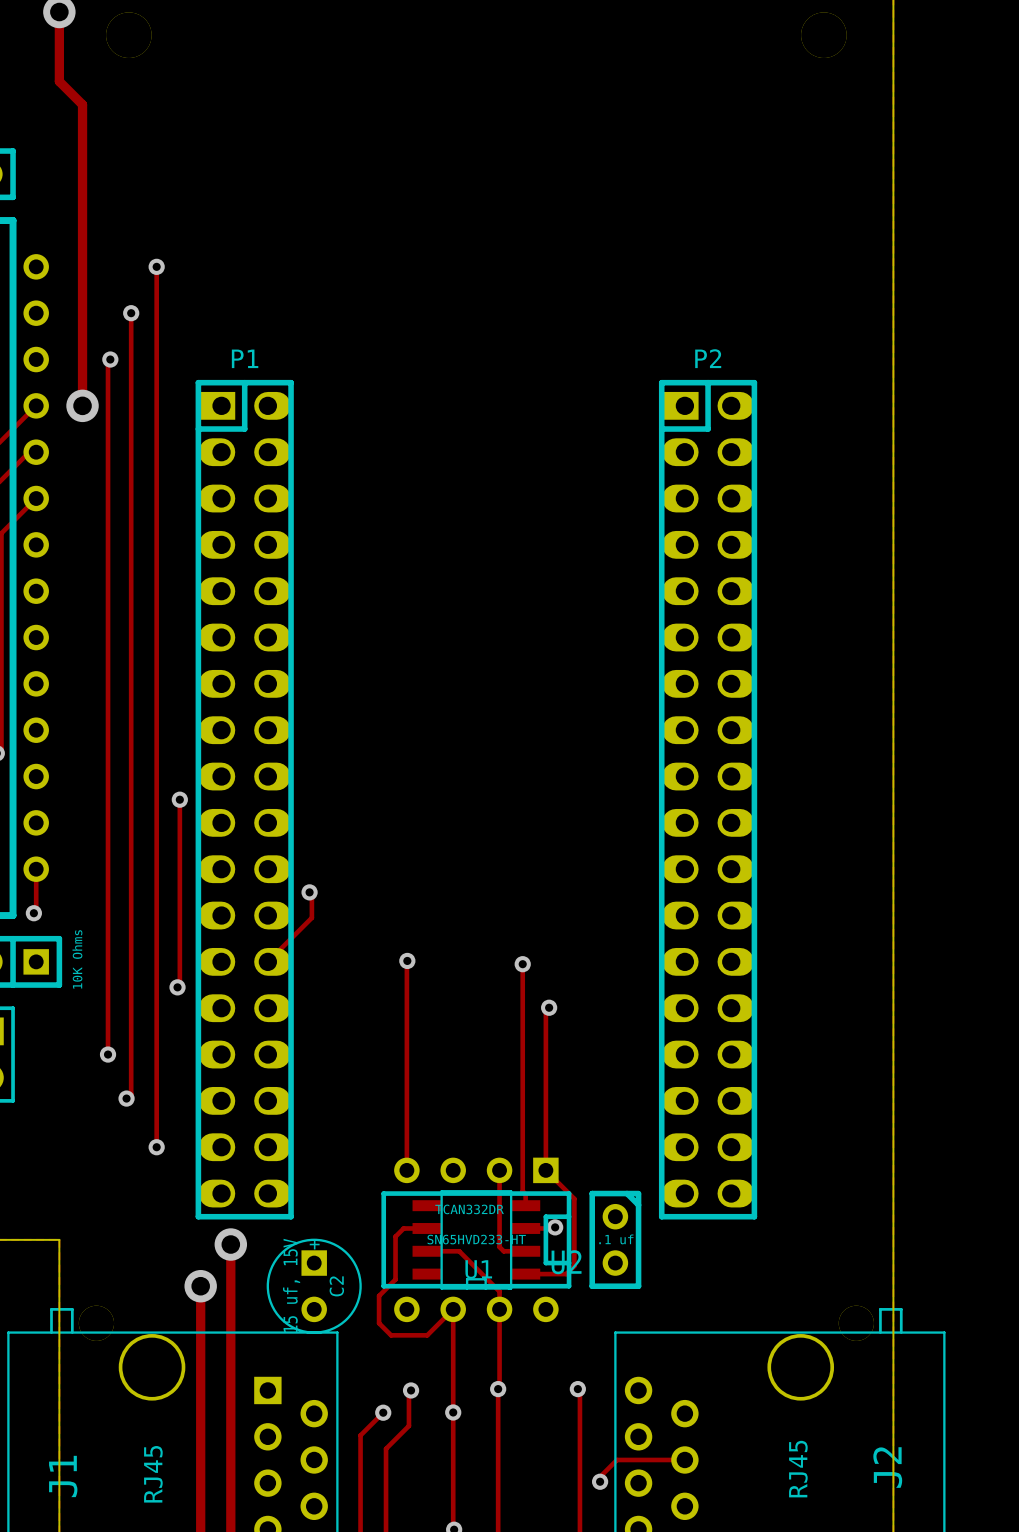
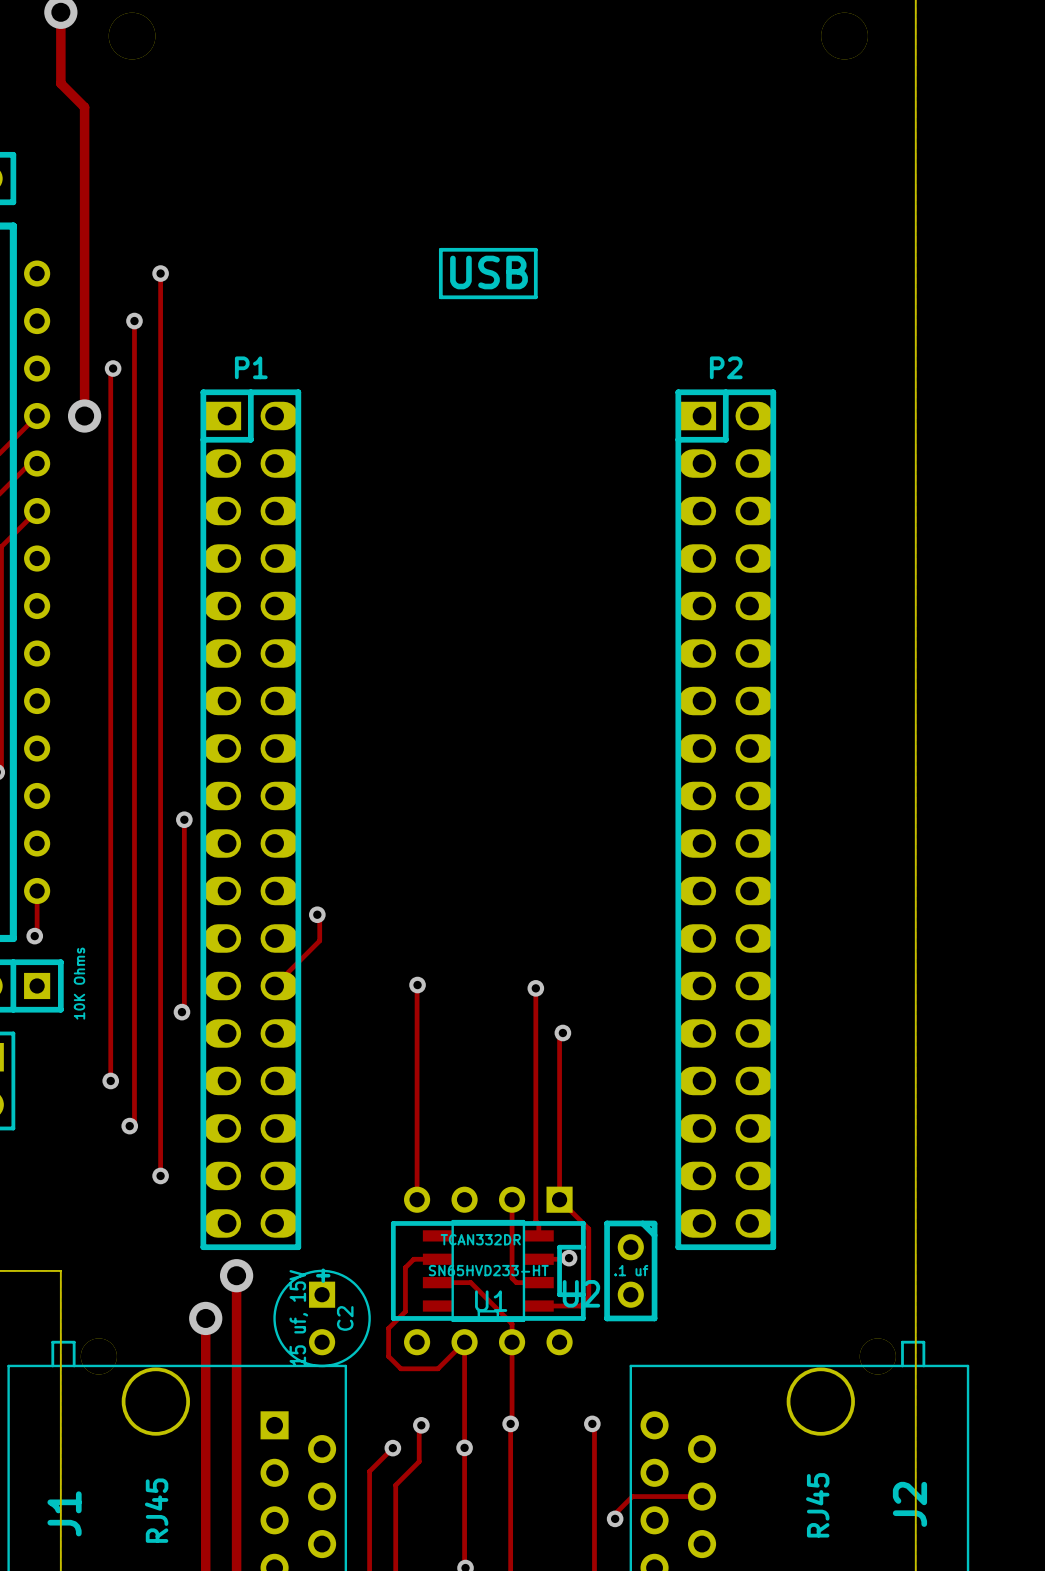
line: none -> (440, 249) (440, 297) (535, 297) (535, 249) (440, 249)
text: none -> USB (488, 272)

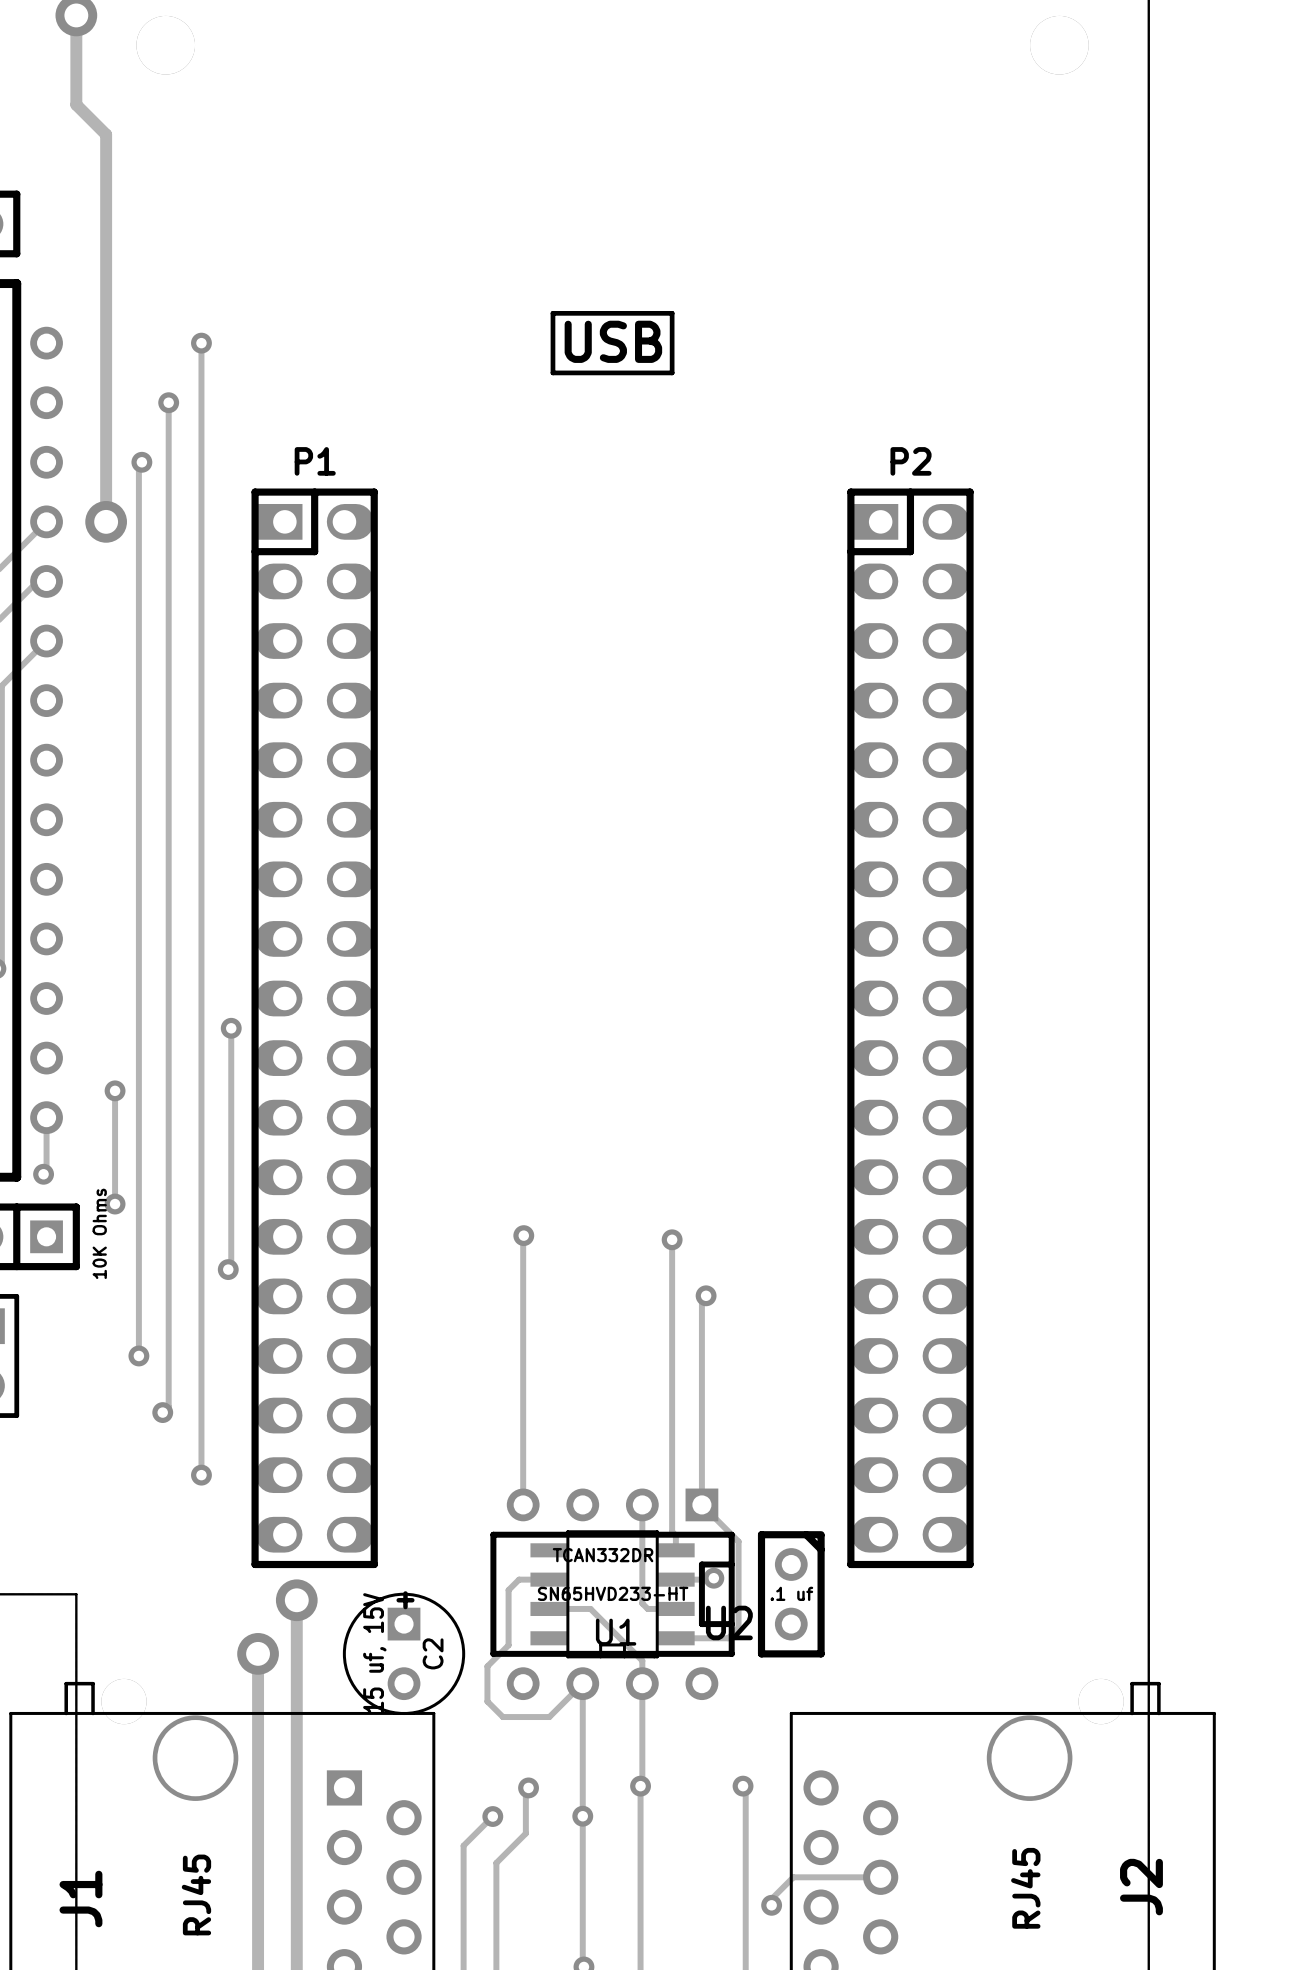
track: none -> (115, 1090) (115, 1204)
via: none -> (115, 1090)
track: (317, 914) (319, 917) (319, 940) (274, 985) -> none
via: (317, 914) -> none
via: none -> (115, 1204)

